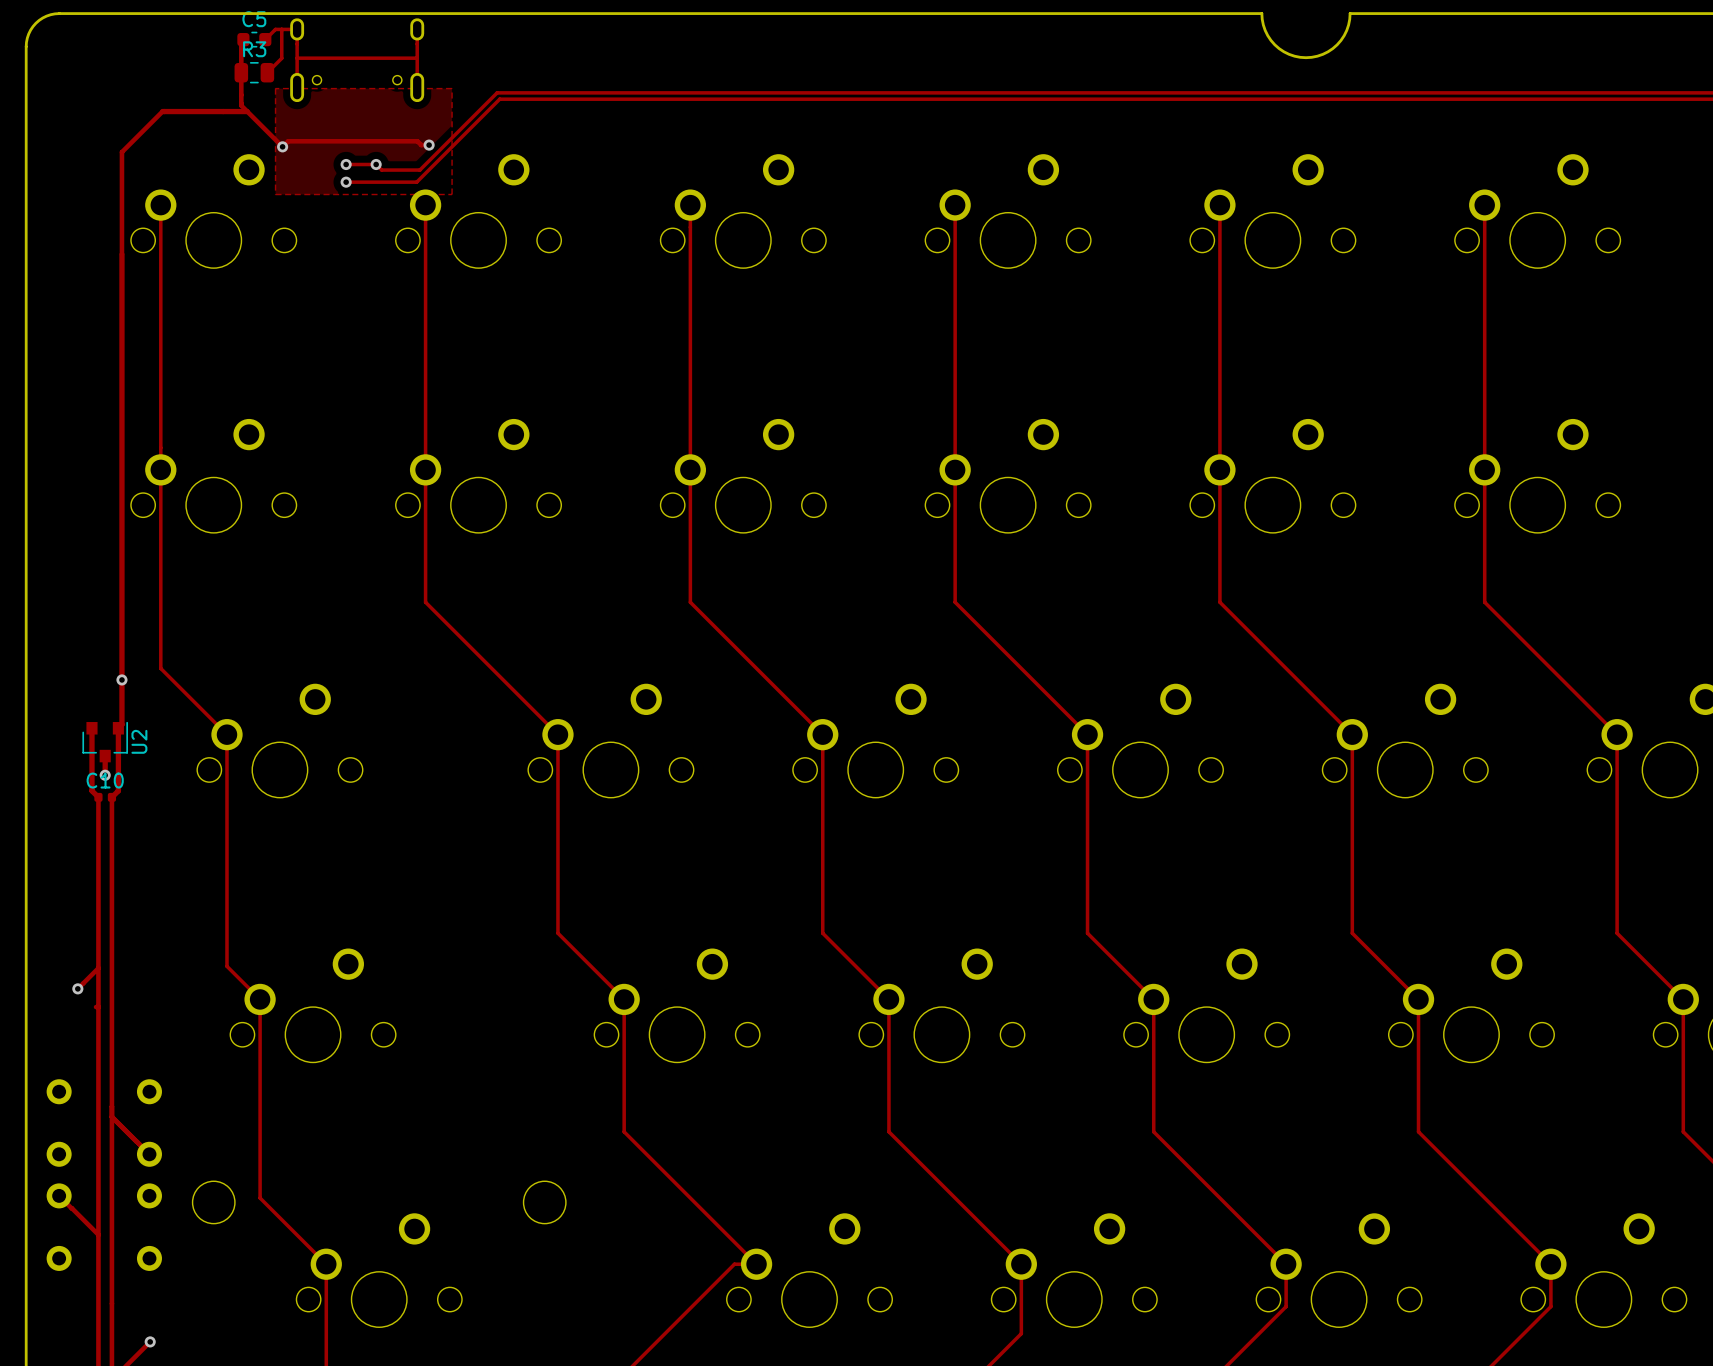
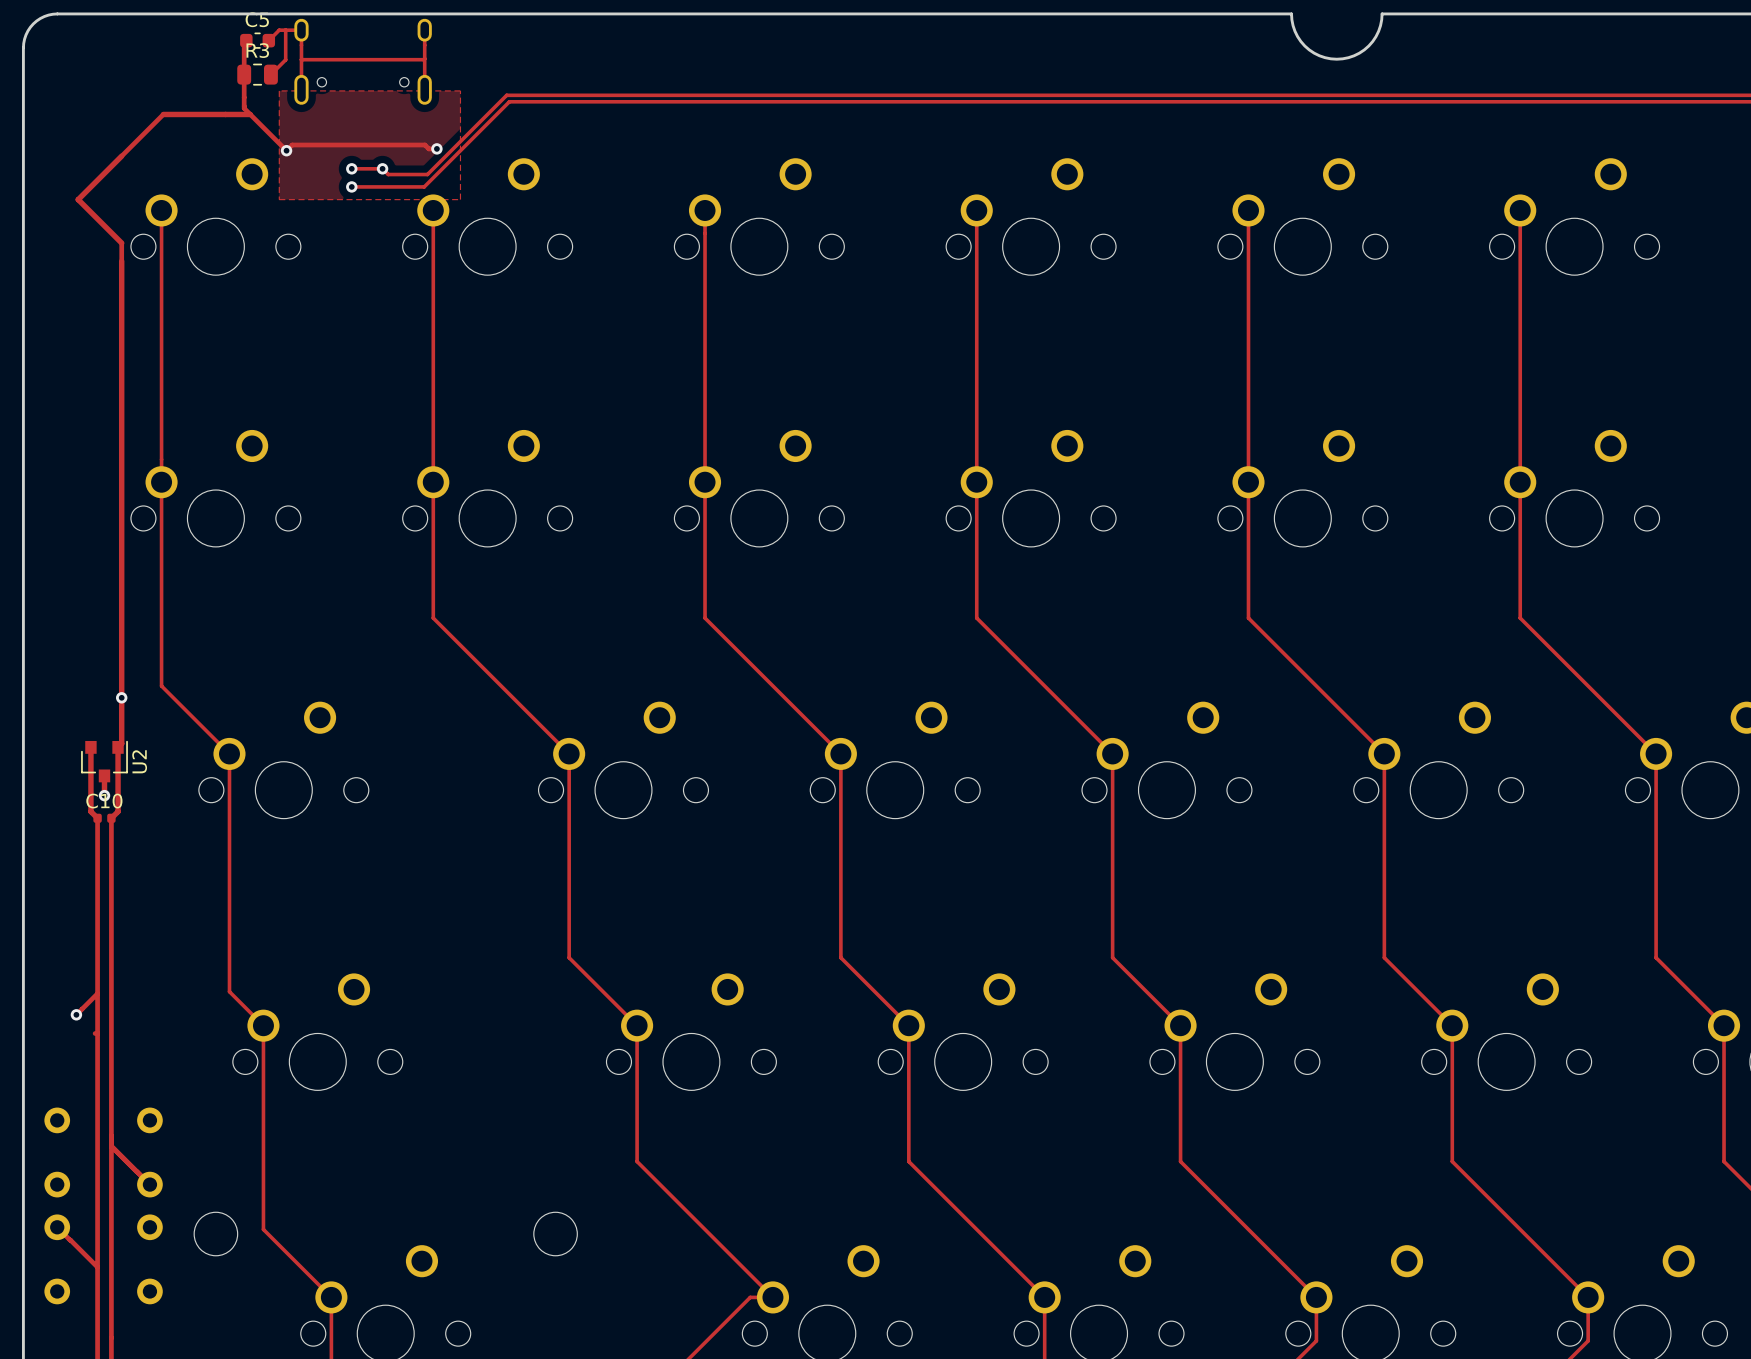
track: (121, 152) (121, 236) -> (121, 156) (78, 199) (121, 243)

